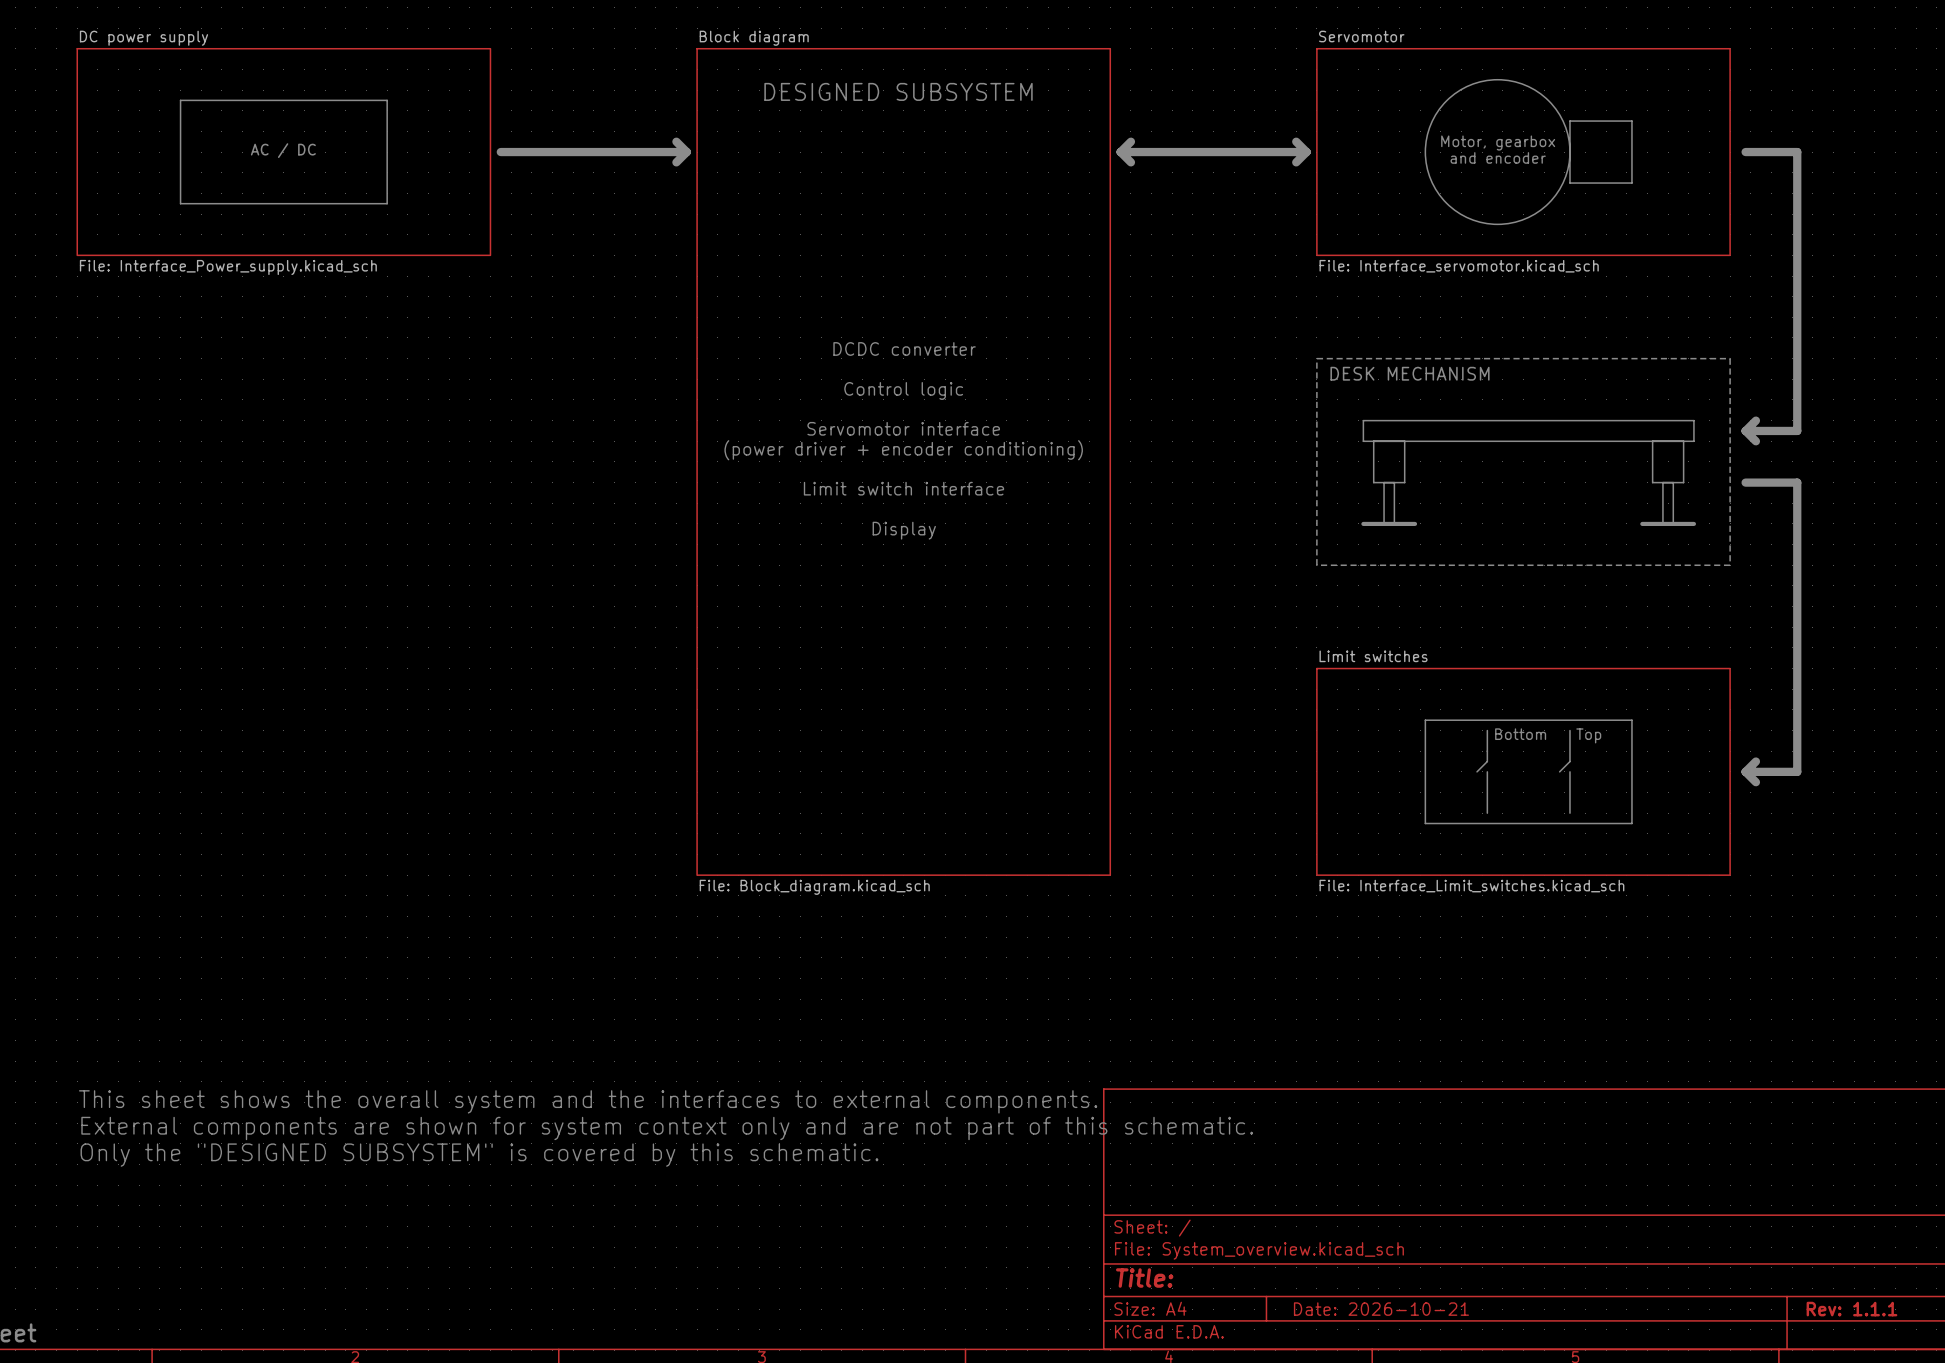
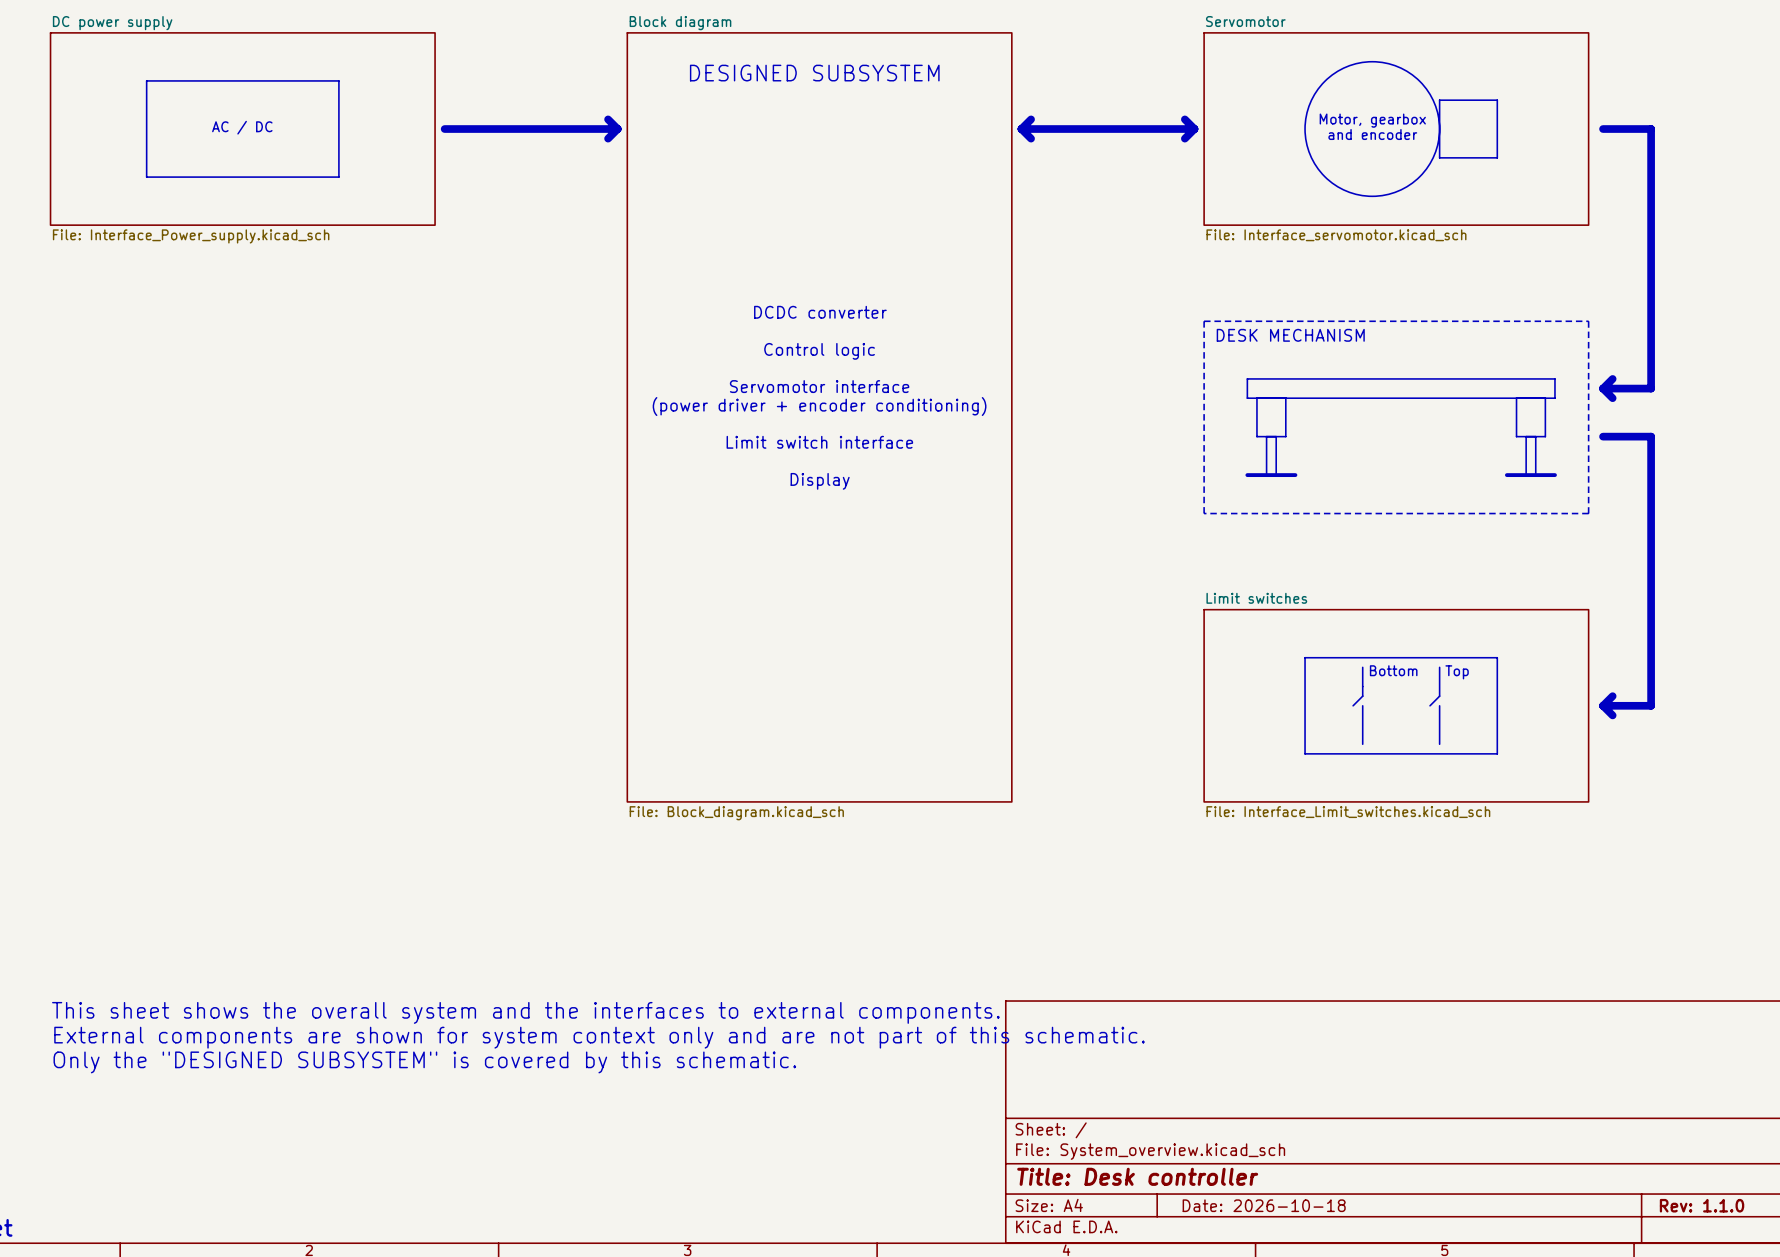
title block: Title: (1144, 1278) -> Title: Desk controller (1137, 1176)
title block: Date: 2026-10-21 (1381, 1309) -> Date: 2026-10-18 (1264, 1205)
title block: Rev: 1.1.1 (1851, 1309) -> Rev: 1.1.0 (1702, 1205)

